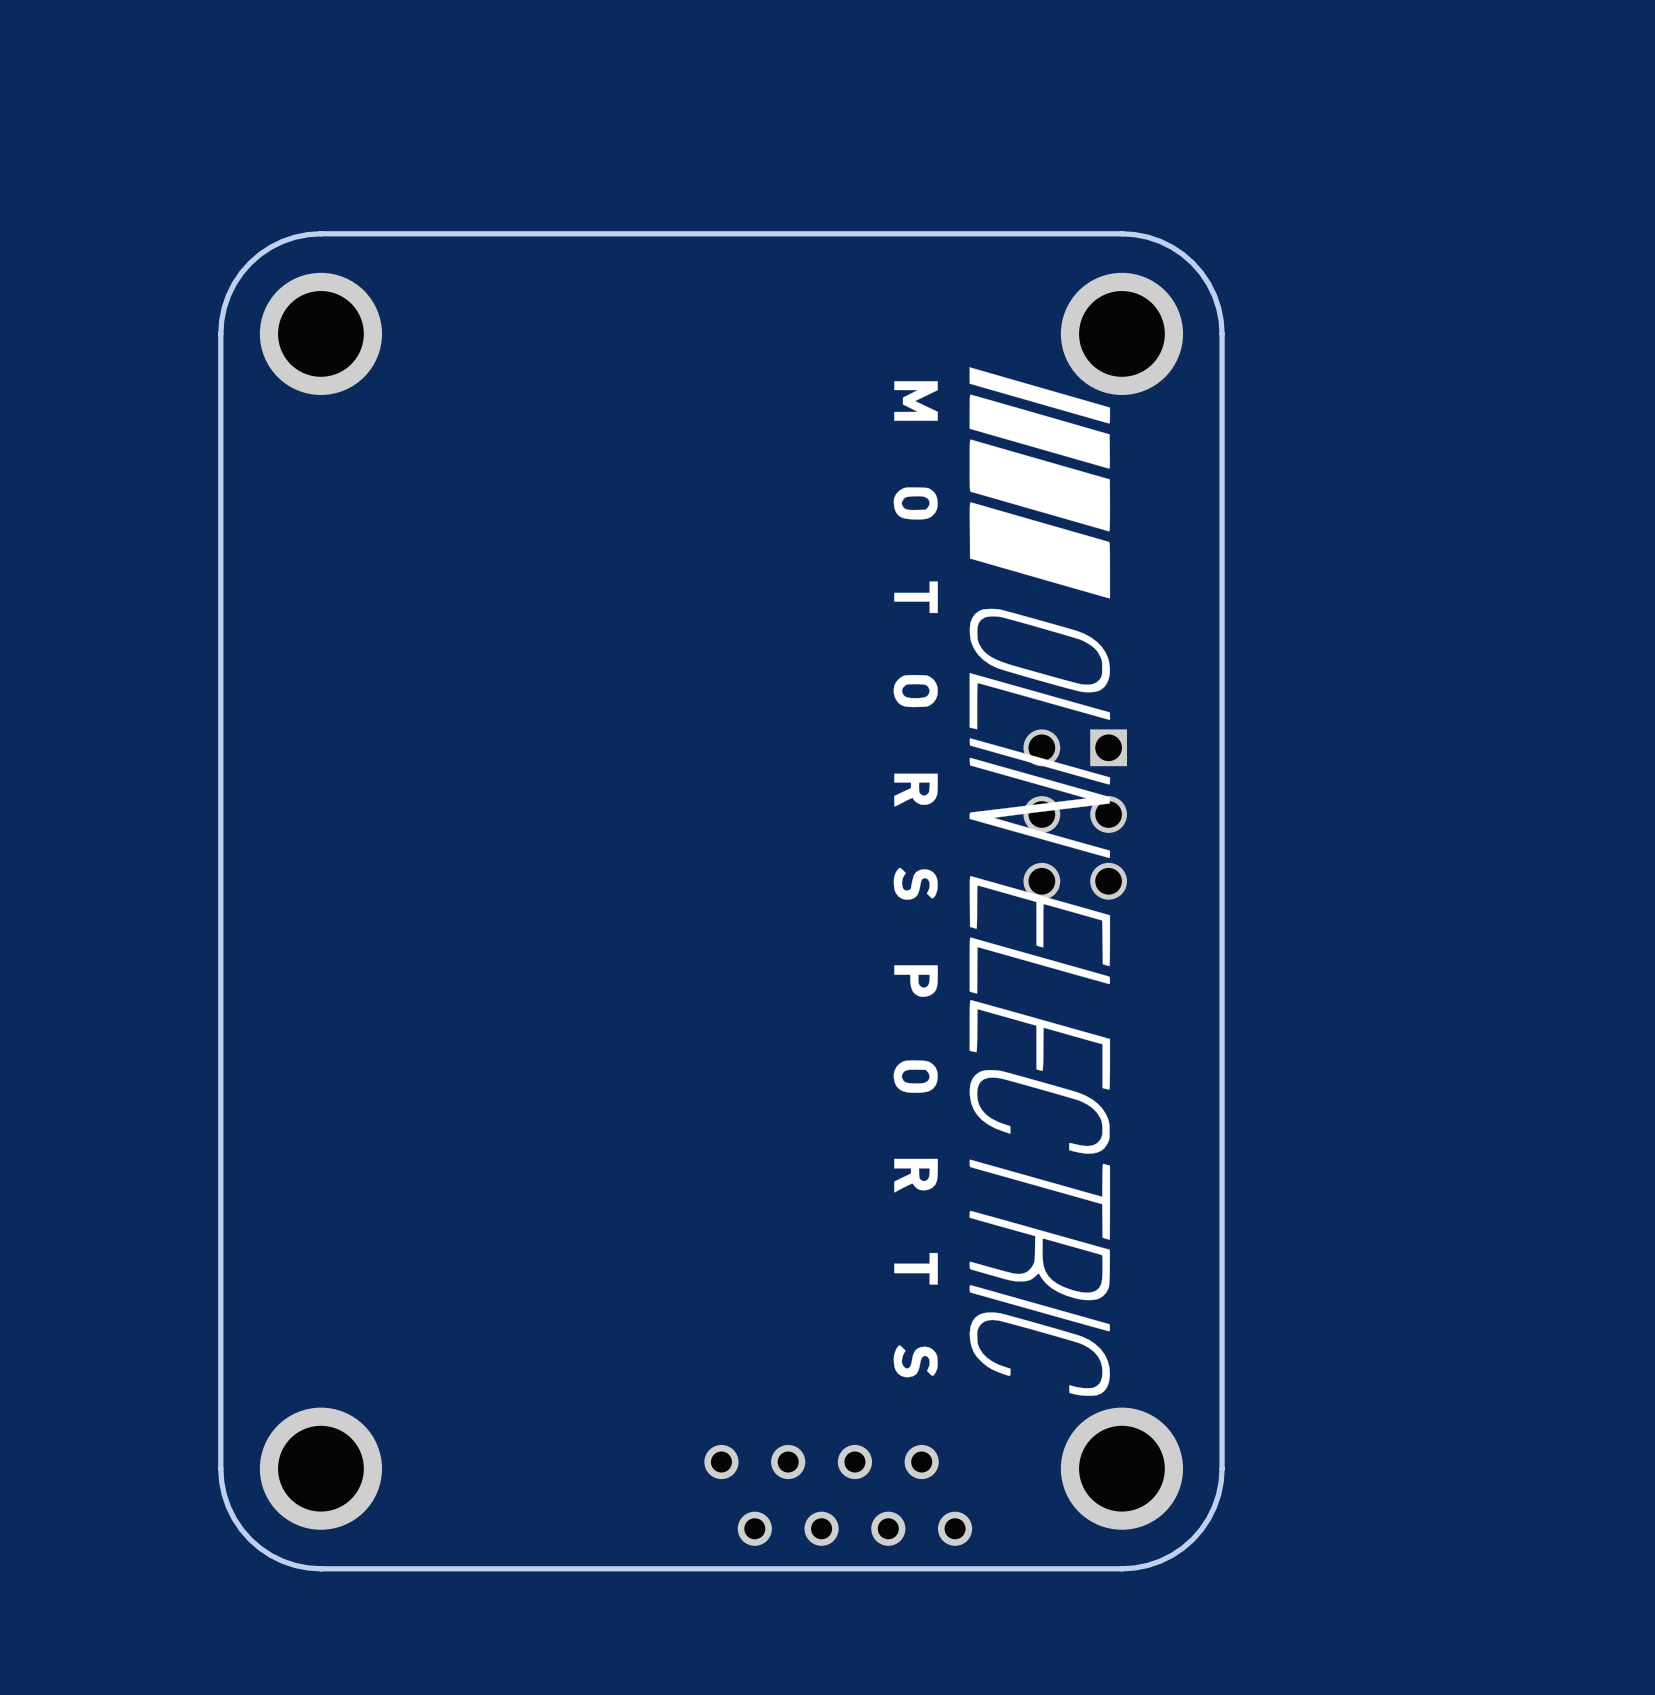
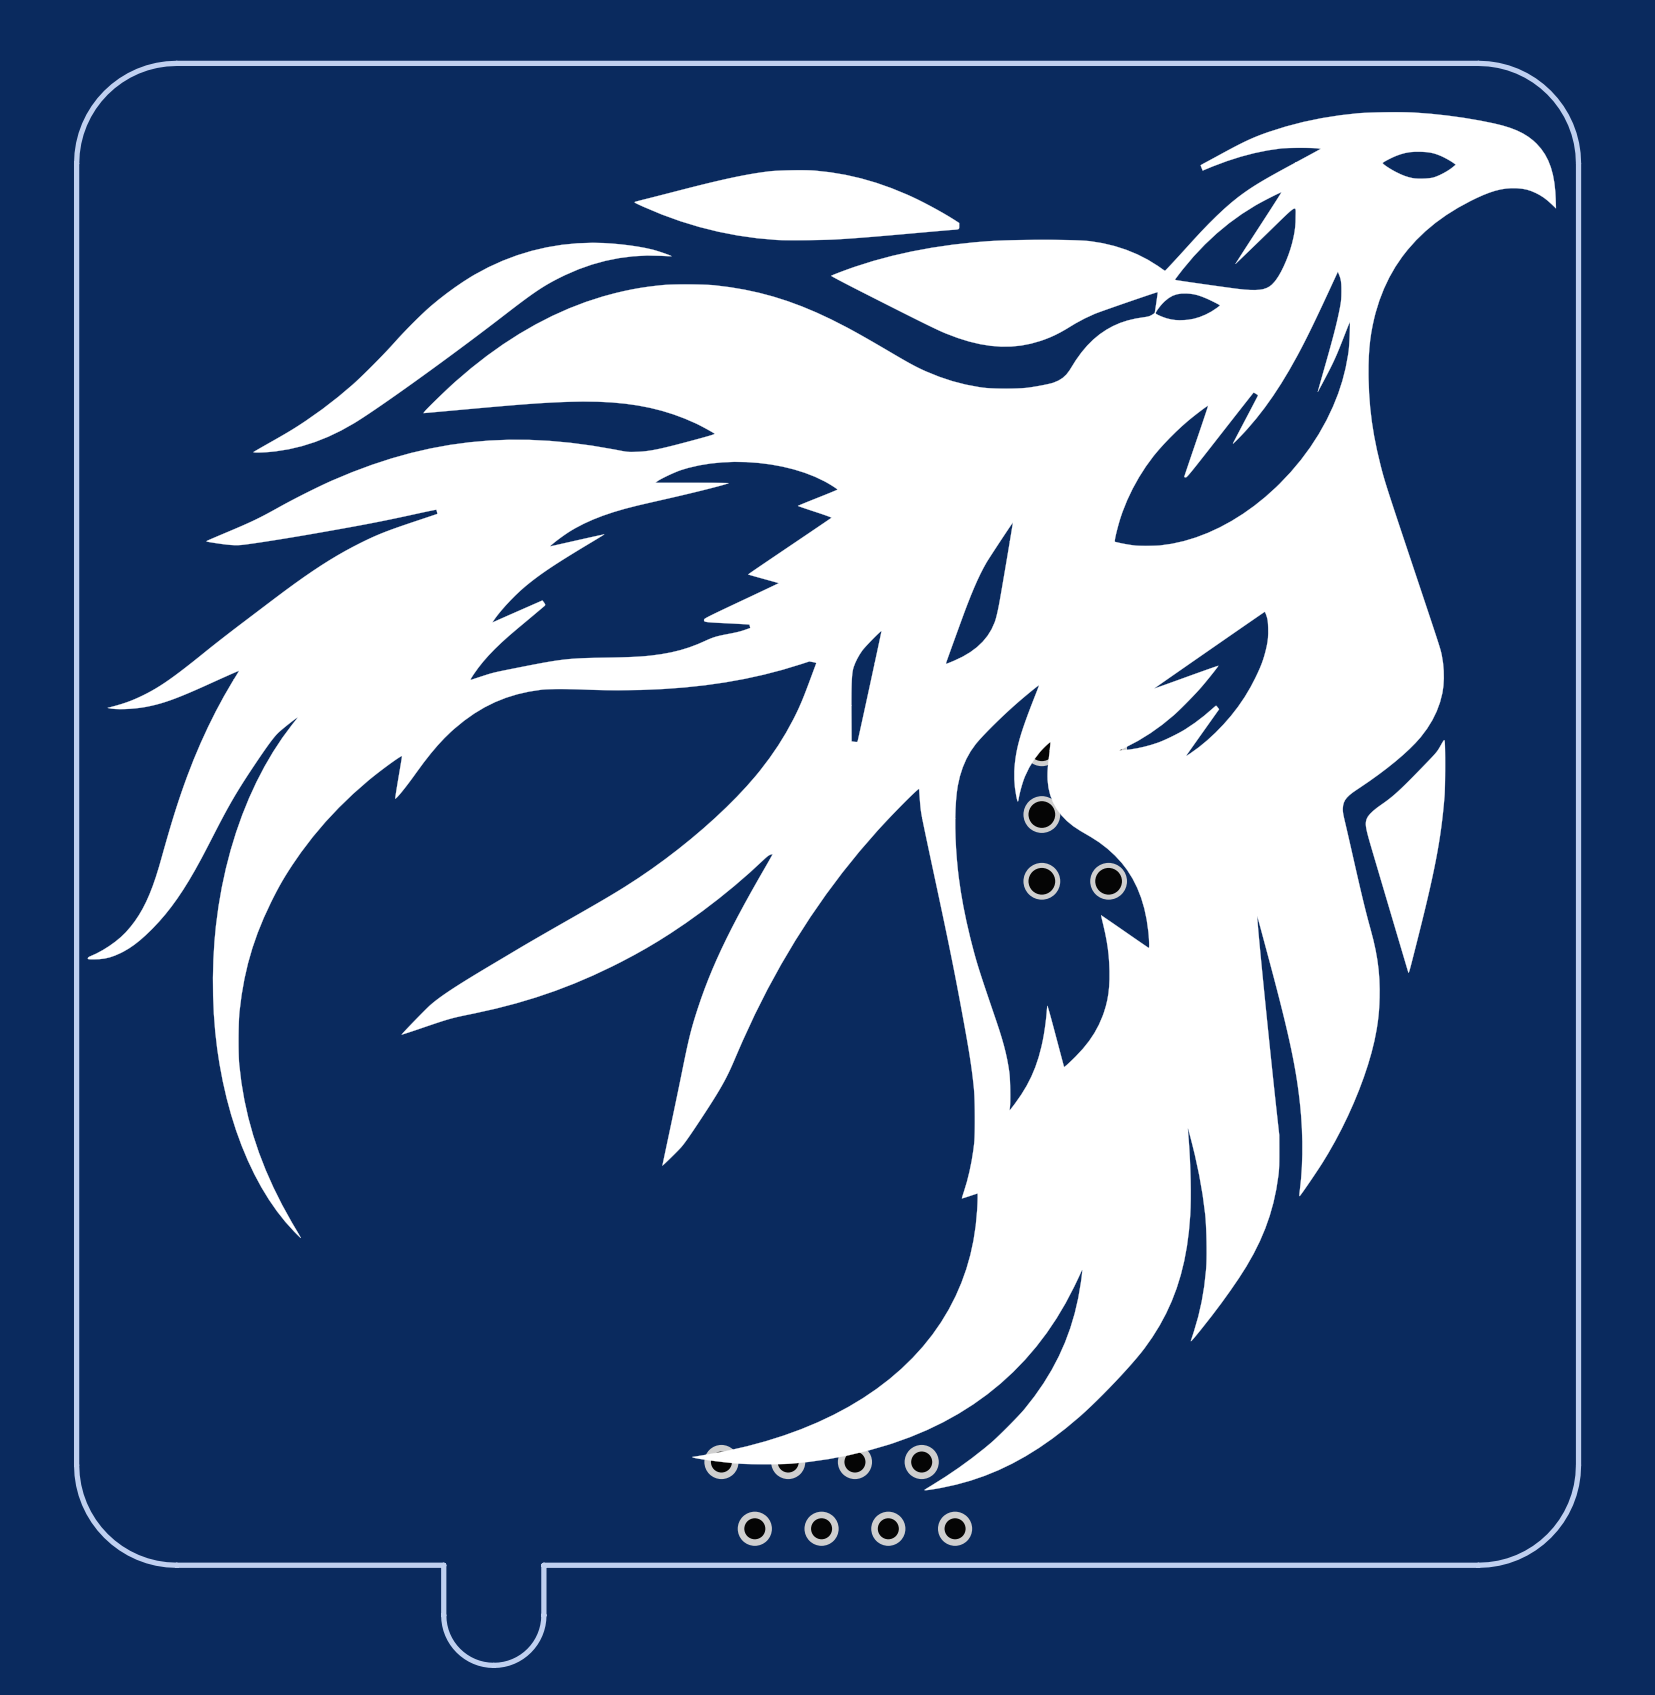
drawing: none -> [87, 112, 1557, 1491]
board edge: (1121, 233) (320, 233) (295, 237) (270, 247) (250, 263) (234, 283) (224, 308) (220, 333) (220, 1468) (224, 1494) (234, 1518) (250, 1539) (270, 1555) (295, 1565) (320, 1568) (1121, 1568) (1147, 1565) (1172, 1555) (1192, 1539) (1208, 1518) (1218, 1494) (1222, 1468) (1221, 320) (1214, 295) (1208, 283) (1192, 263) (1172, 247) (1160, 241) (1135, 234) (1121, 233) -> none
part: (320, 333) -> none
part: (1121, 333) -> none
drawing: [893, 367, 1111, 1396] -> none
board edge: none -> (1578, 1465) (1578, 163) (1576, 143) (1570, 124) (1561, 107) (1549, 92) (1534, 80) (1517, 71) (1498, 65) (1478, 63) (166, 63) (137, 71) (120, 80) (105, 92) (93, 107) (84, 124) (77, 153) (76, 1465) (78, 1485) (84, 1504) (93, 1521) (105, 1535) (120, 1548) (137, 1557) (156, 1563) (176, 1565)
board edge: none -> (1578, 1465) (1574, 1494) (1566, 1512) (1555, 1528) (1542, 1542) (1526, 1553) (1508, 1560) (1488, 1564) (543, 1565)
part: (320, 1468) -> none
part: (1121, 1468) -> none
board edge: none -> (543, 1565) (543, 1620) (537, 1639) (529, 1650) (517, 1659) (493, 1665) (469, 1659) (458, 1650) (449, 1639) (444, 1620) (443, 1565) (176, 1565)

